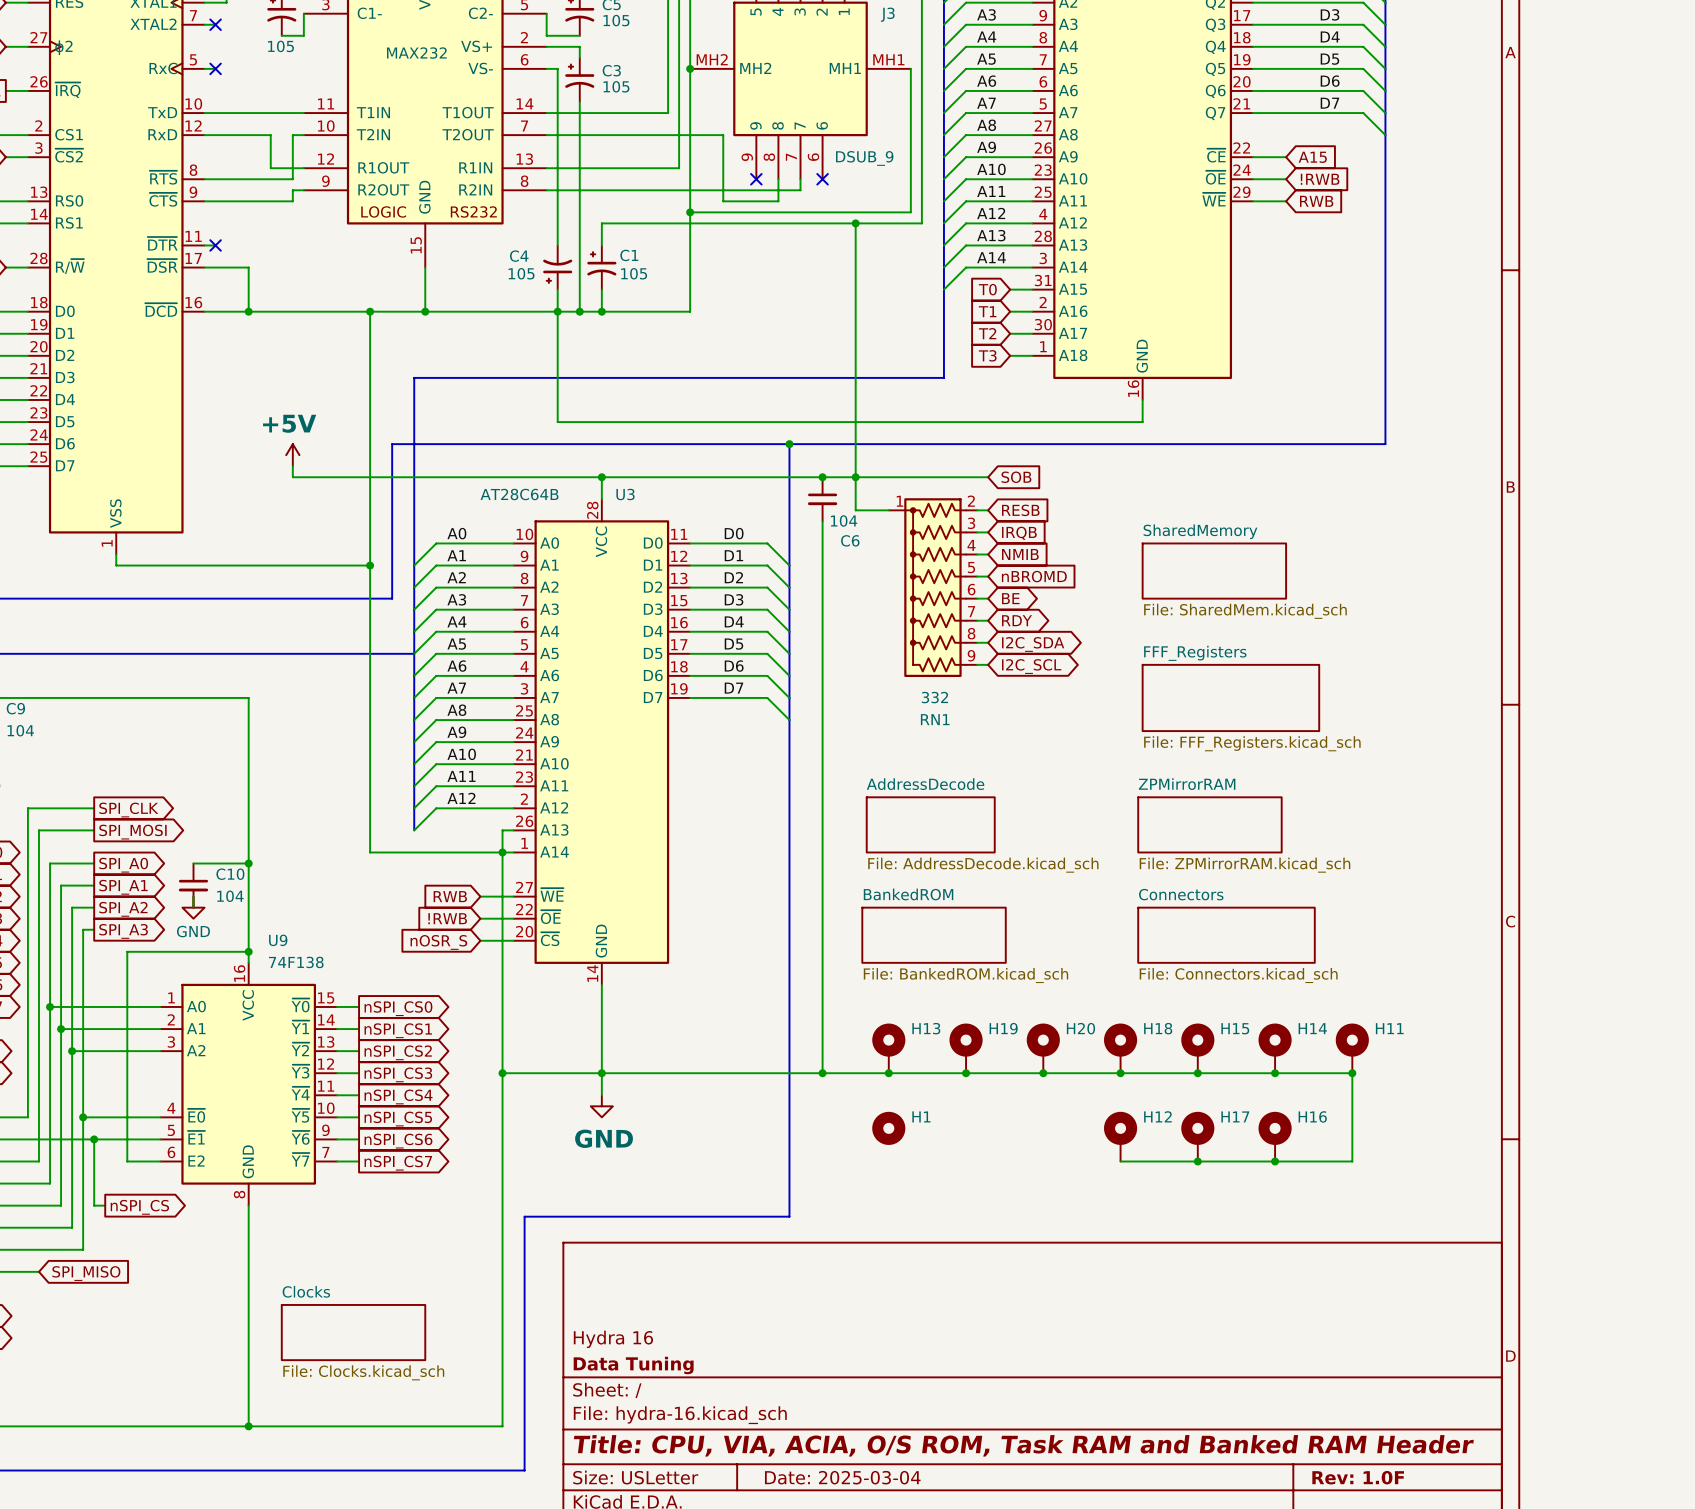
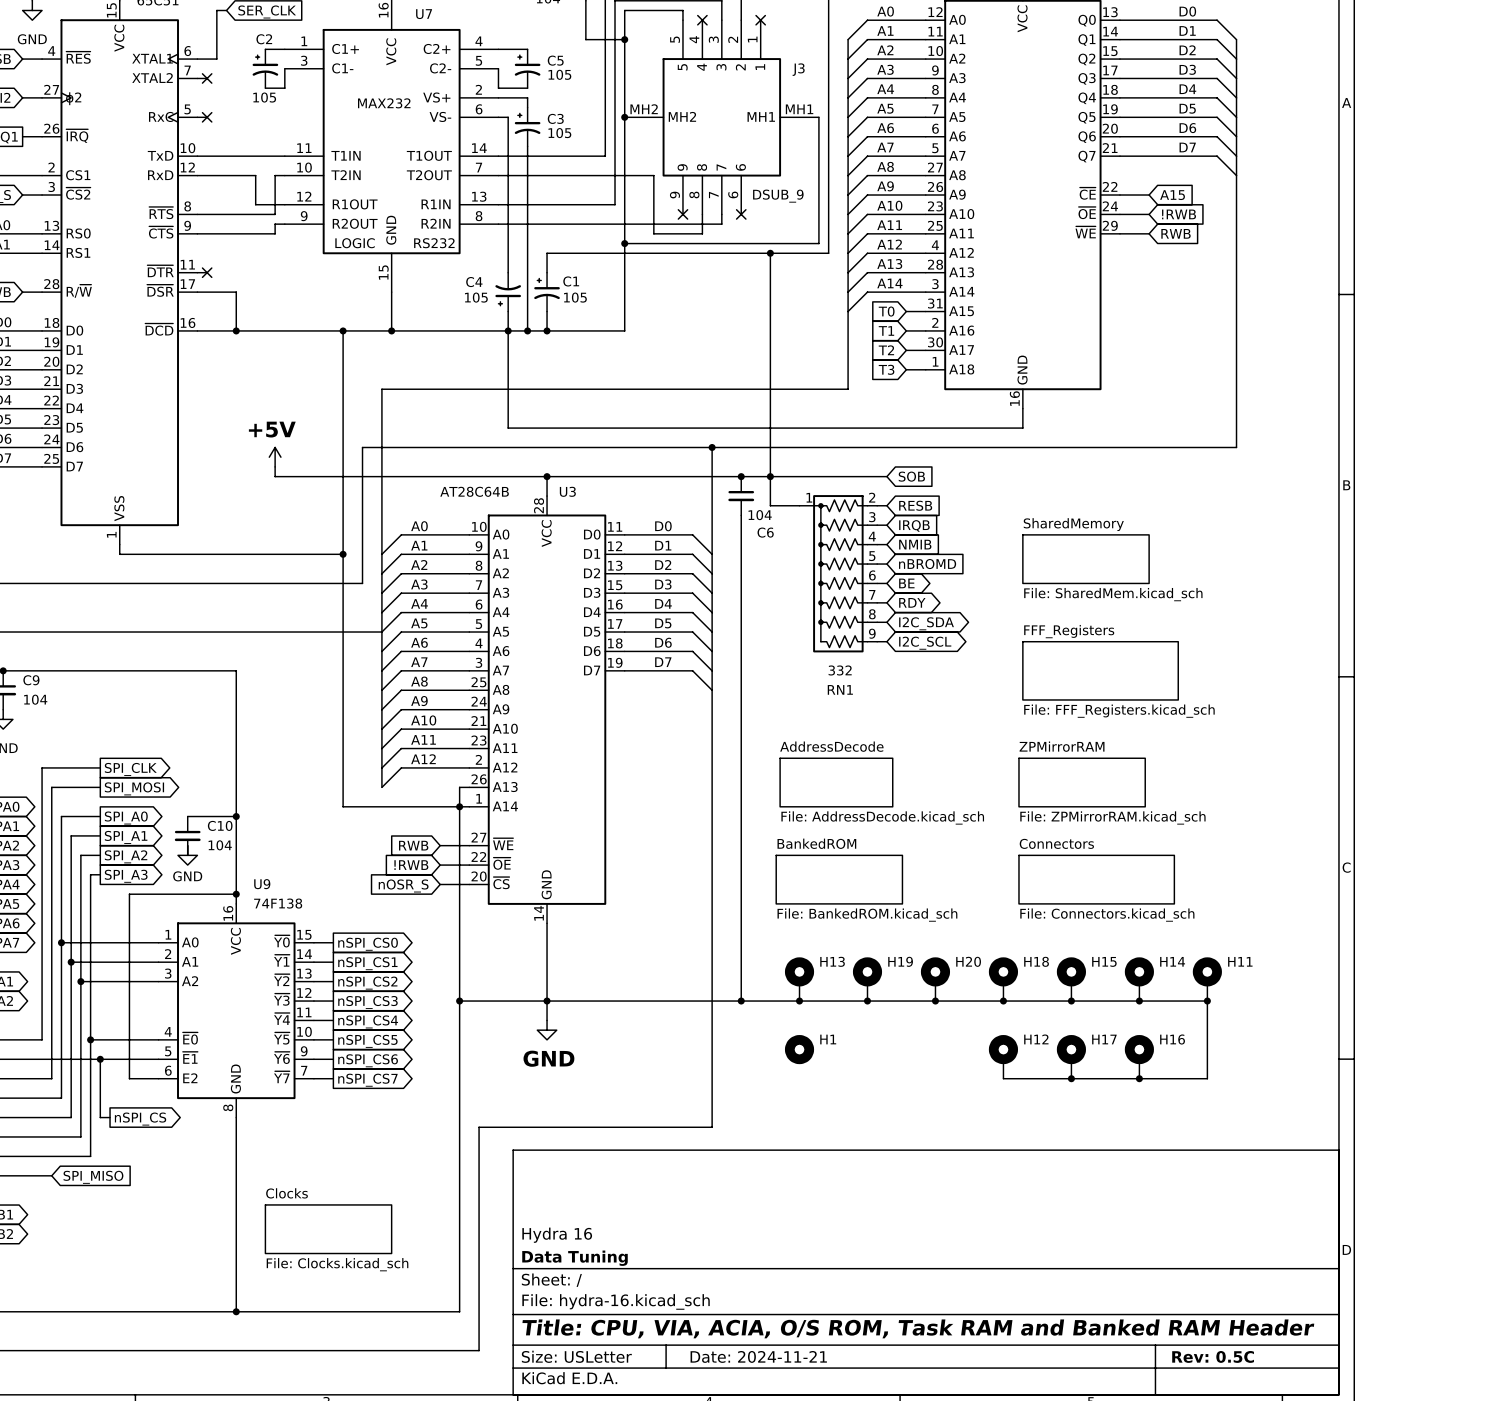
title block: Date: 2025-03-04 (842, 1477) -> Date: 2024-11-21 (758, 1356)
title block: Rev: 1.0F (1358, 1477) -> Rev: 0.5C (1213, 1356)

